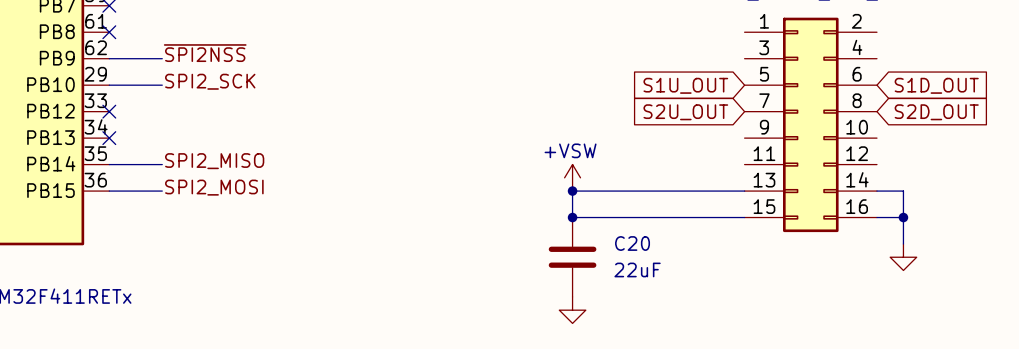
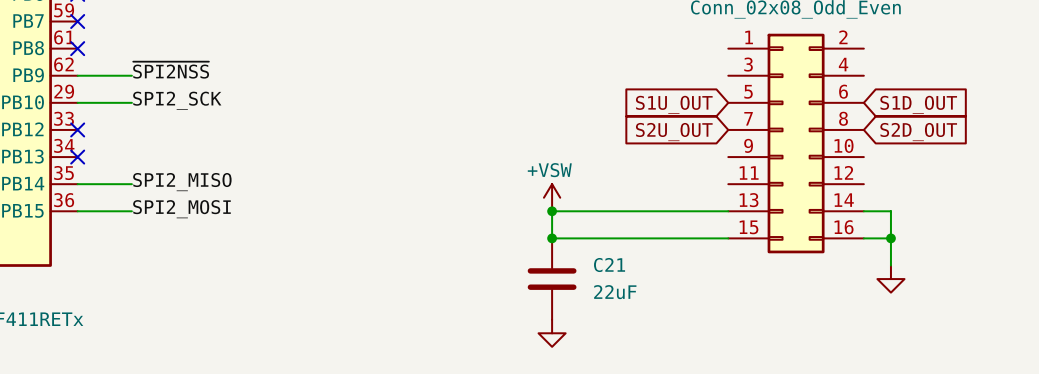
C20 name: C20 (632, 243) -> C21 (609, 265)

